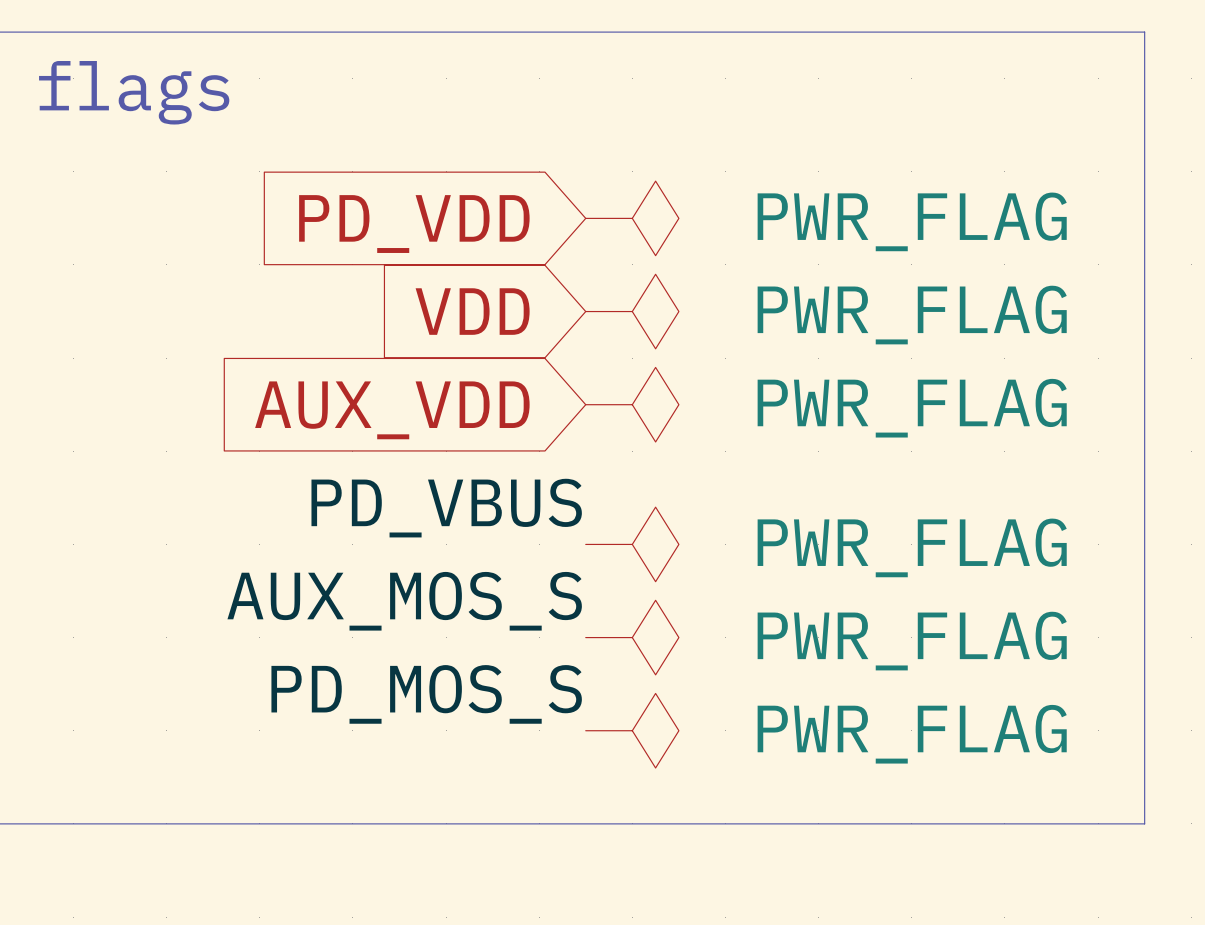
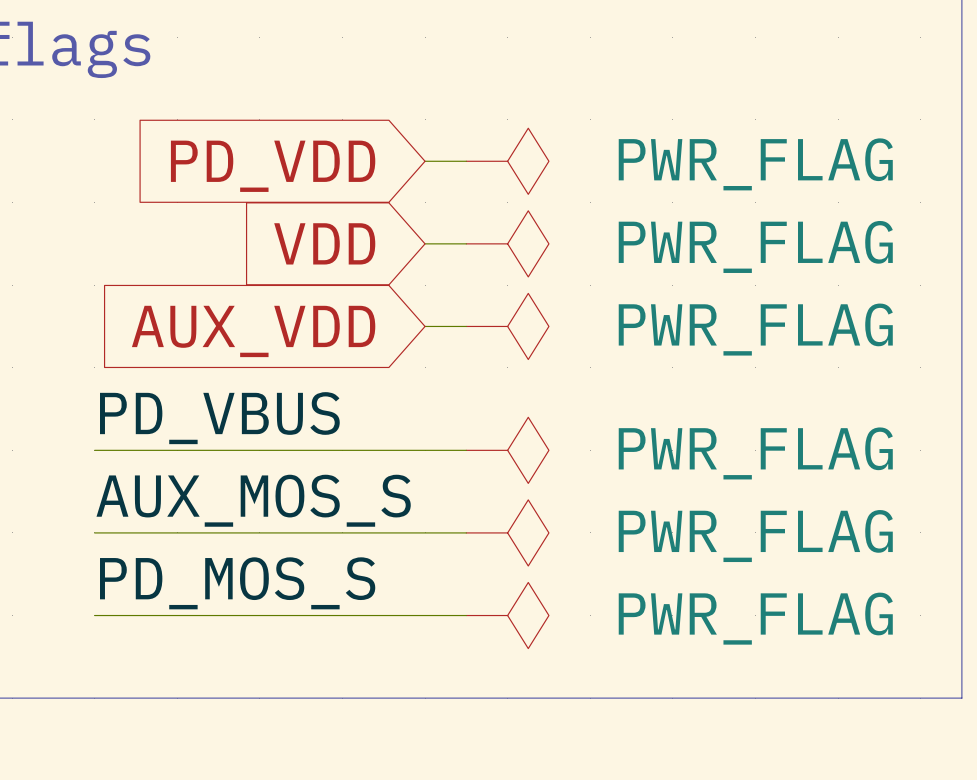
wire: none -> (425, 161) (466, 161)
global label position: PD_VDD (414, 224) -> PD_VDD (273, 166)
global label position: VDD (472, 311) -> VDD (324, 243)
wire: none -> (425, 243) (466, 243)
wire: none -> (425, 326) (466, 326)
global label position: AUX_VDD (392, 410) -> AUX_VDD (253, 331)
label position: PD_VBUS (446, 508) -> PD_VBUS (219, 418)
wire: none -> (94, 450) (466, 450)
label position: AUX_MOS_S (404, 601) -> AUX_MOS_S (253, 500)
wire: none -> (94, 532) (466, 532)
label position: PD_MOS_S (426, 694) -> PD_MOS_S (237, 583)
wire: none -> (94, 615) (466, 615)

